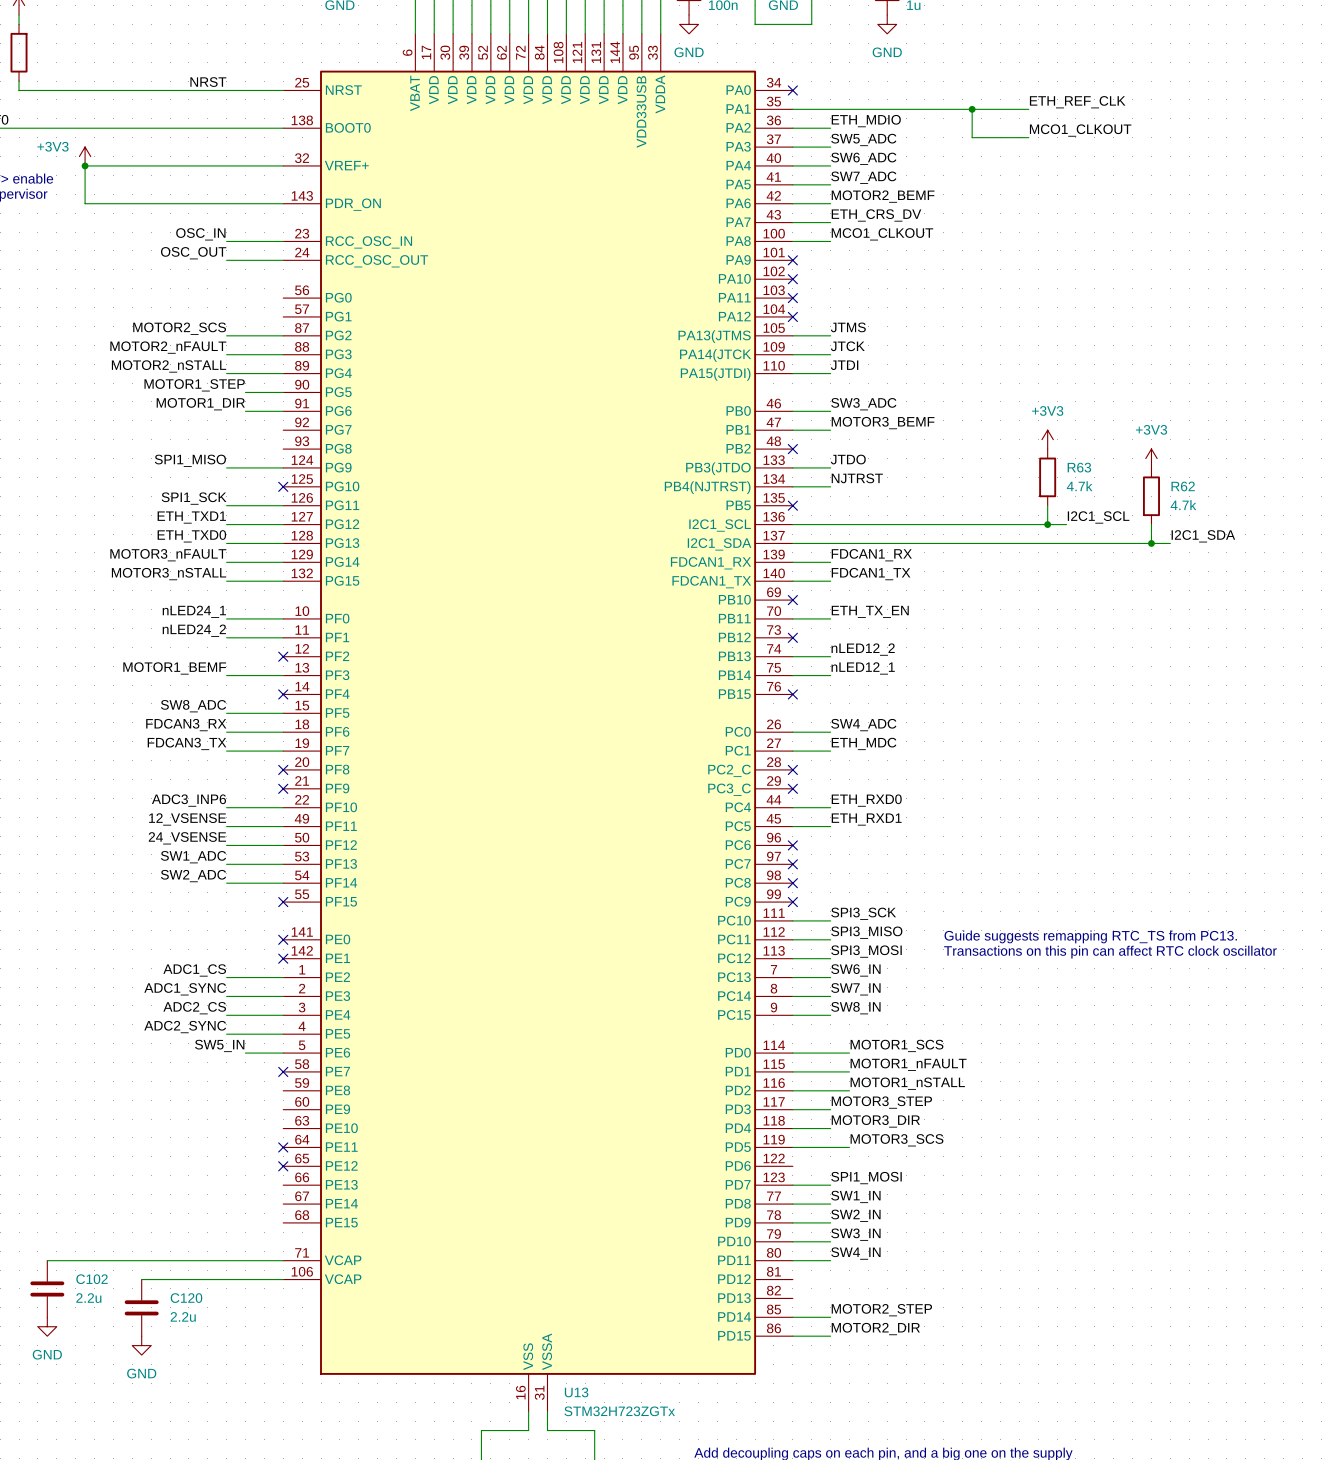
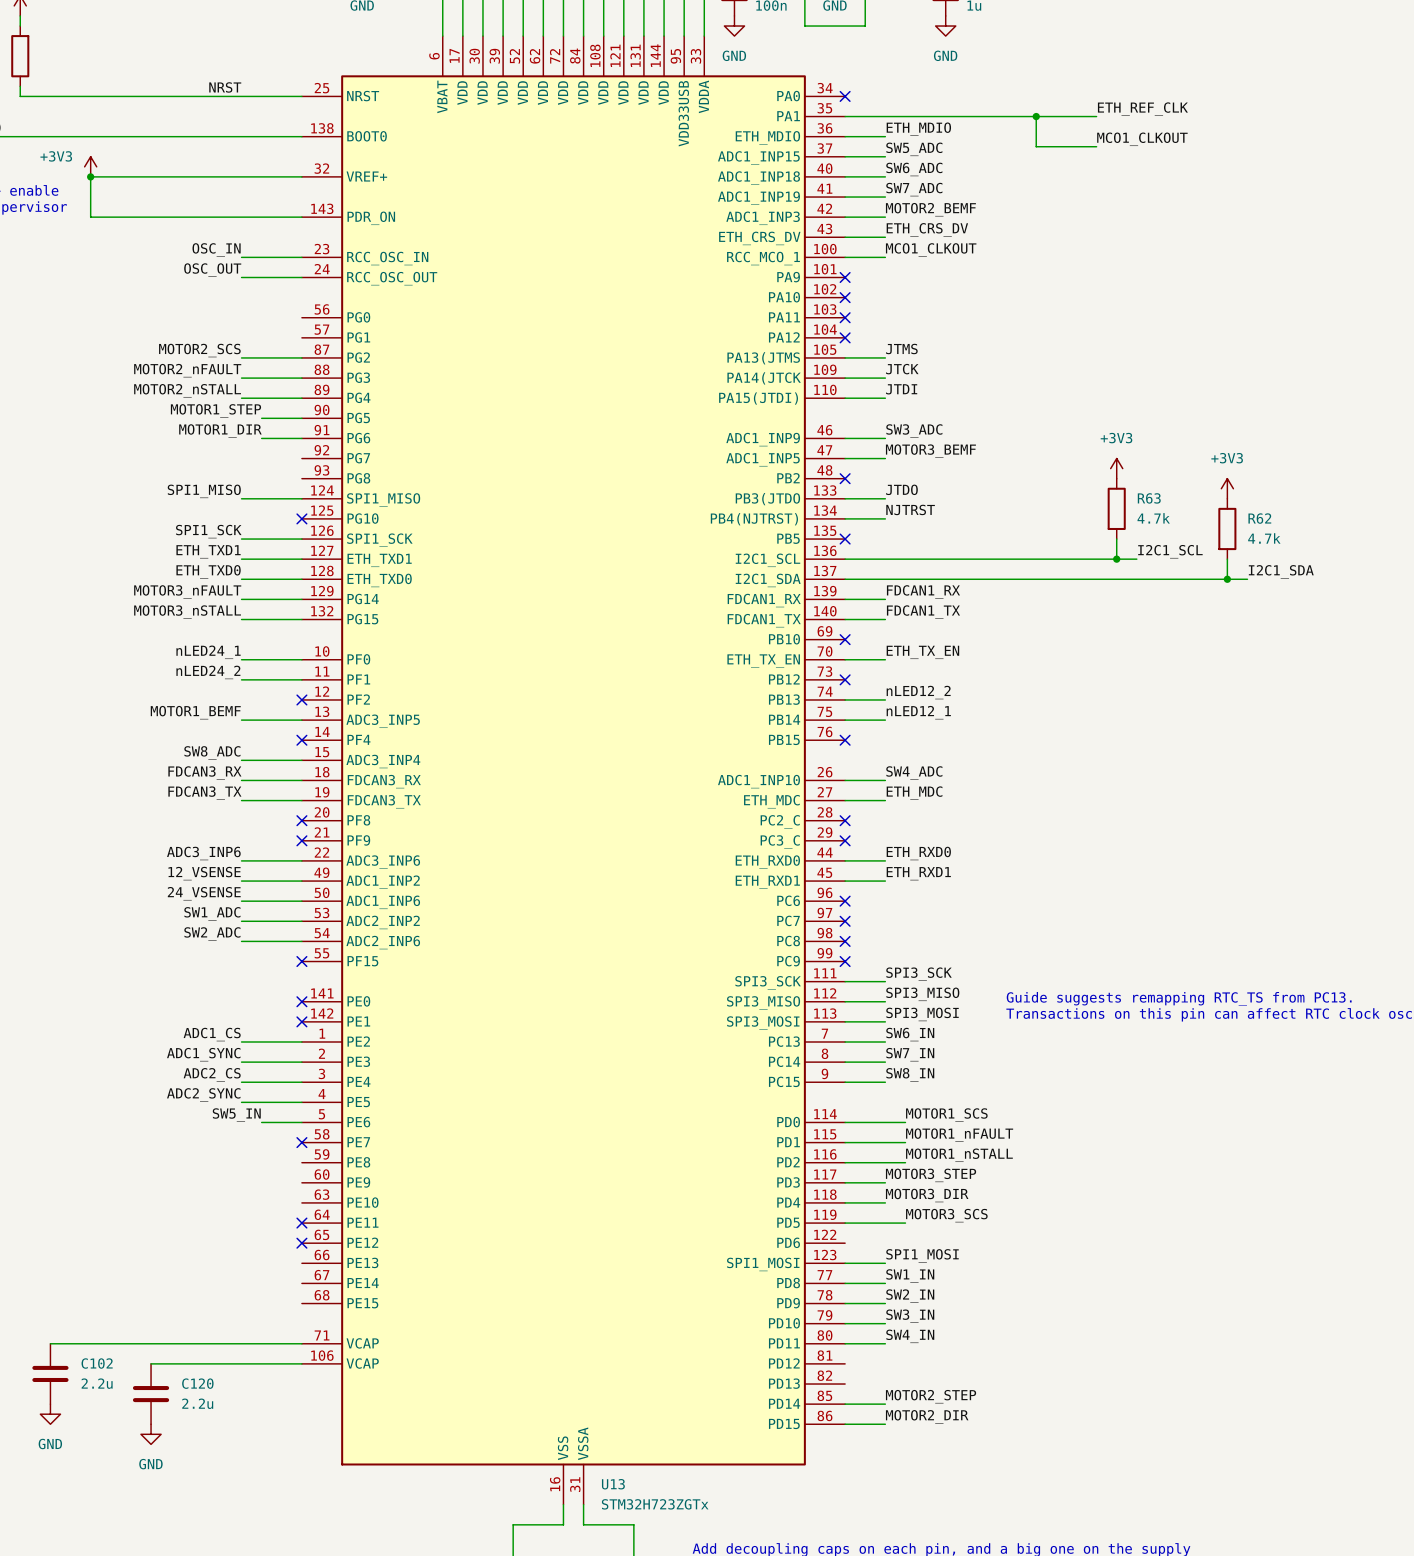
U13 symbol: [283, 33, 793, 1412] -> [301, 36, 846, 1505]

